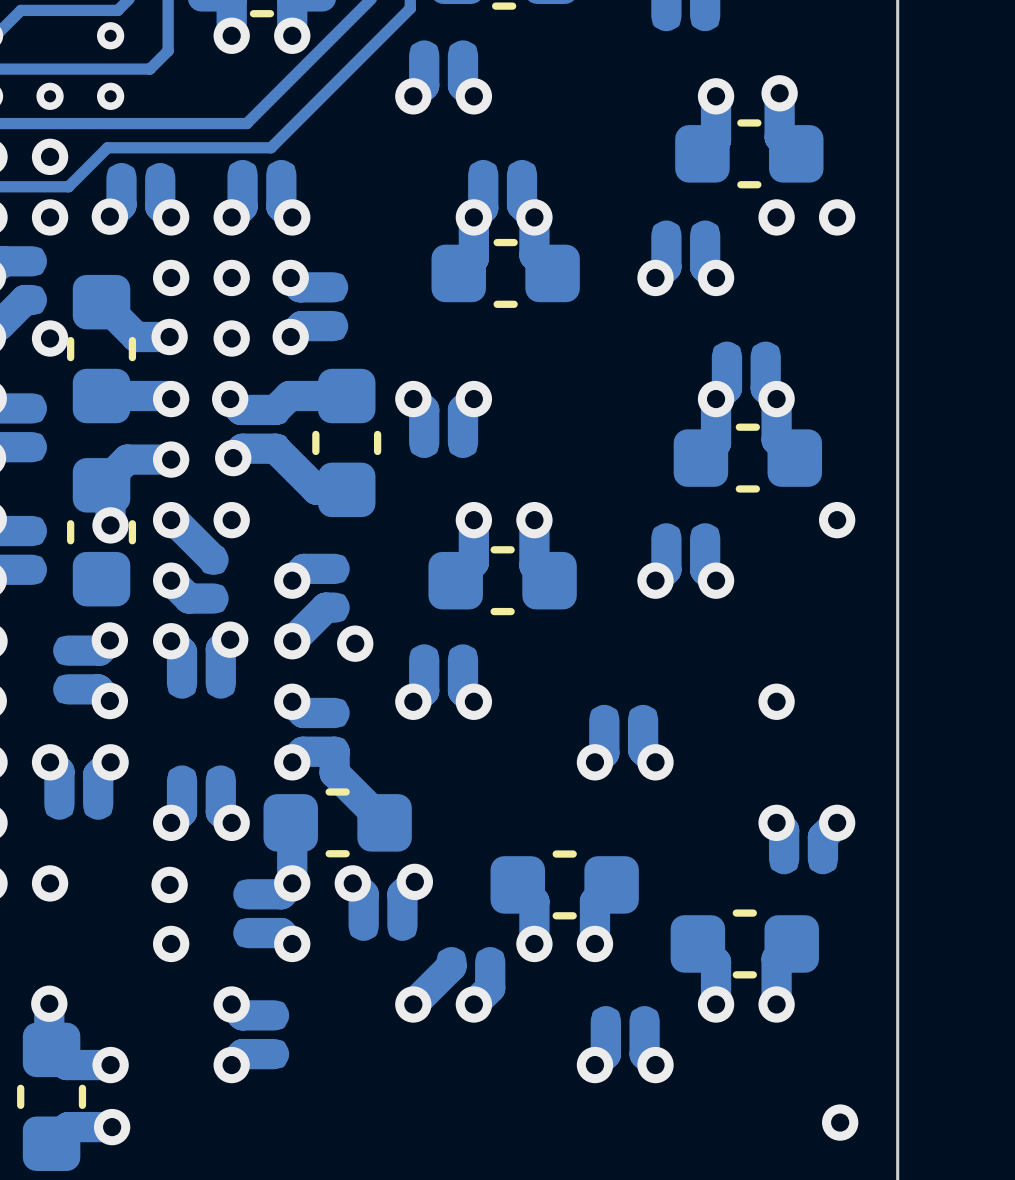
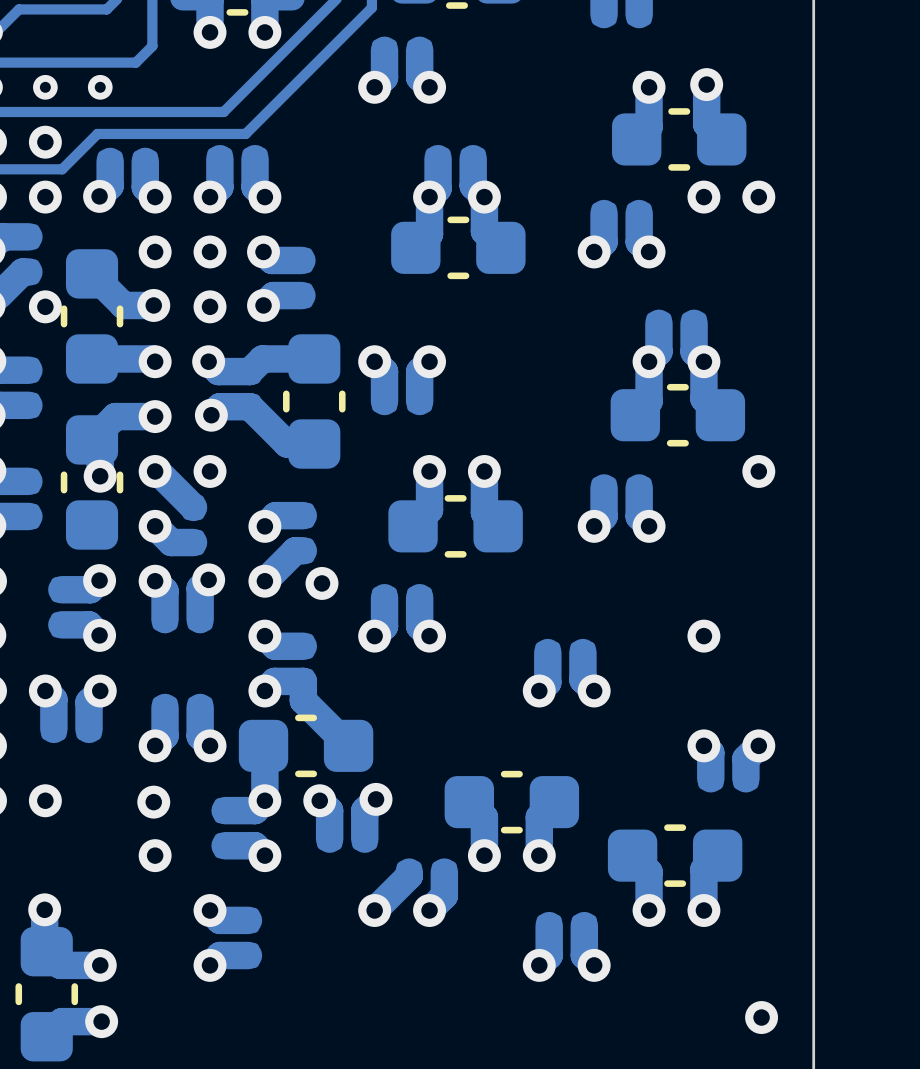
via: (110, 35) -> none

